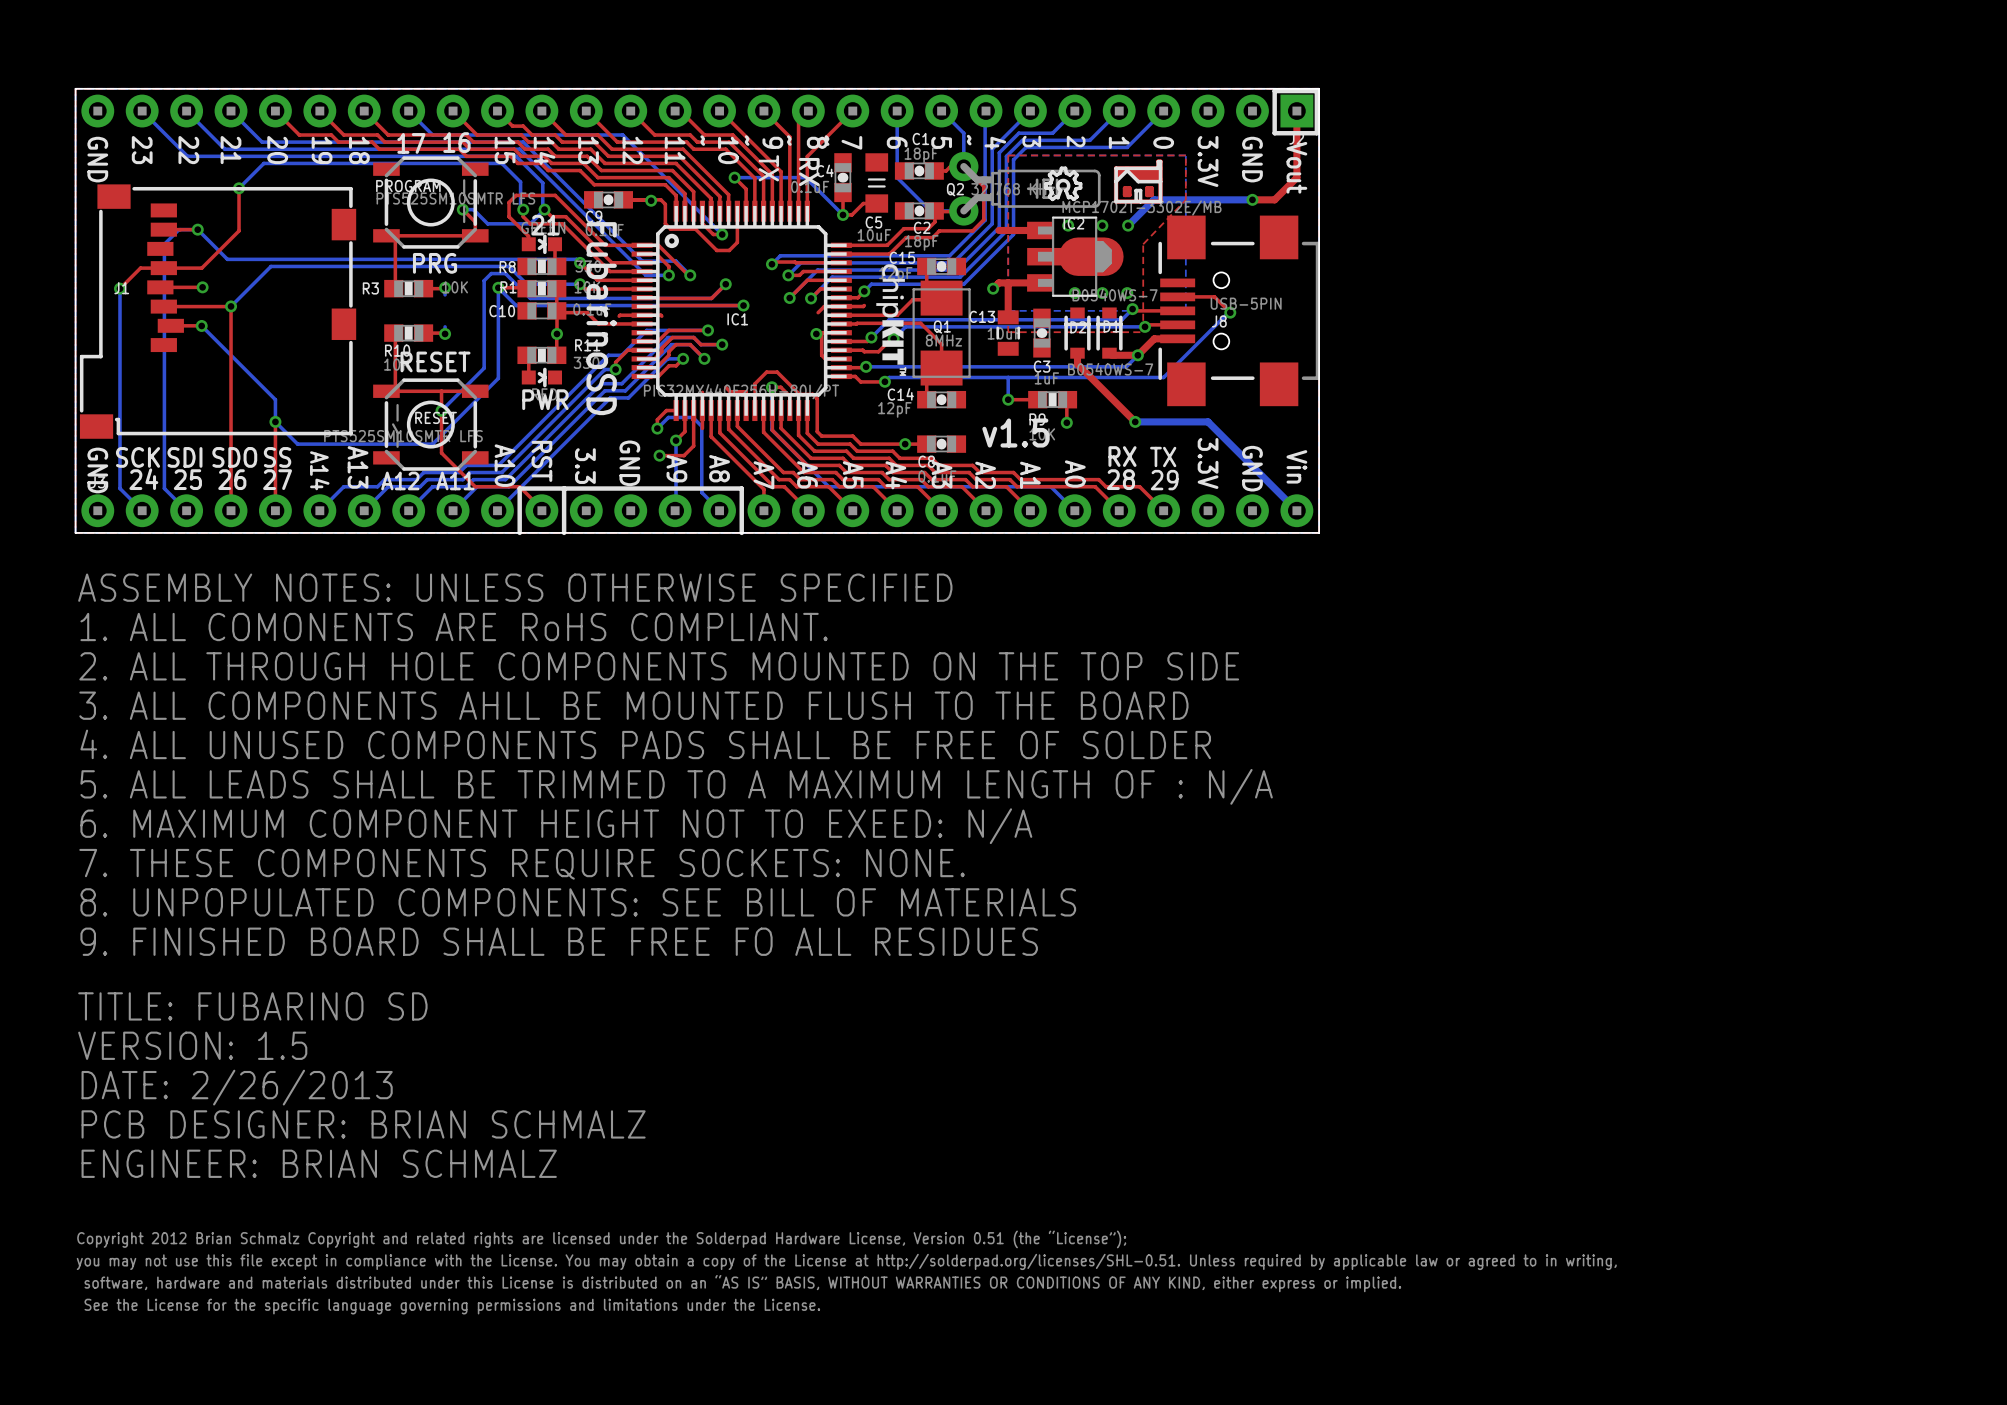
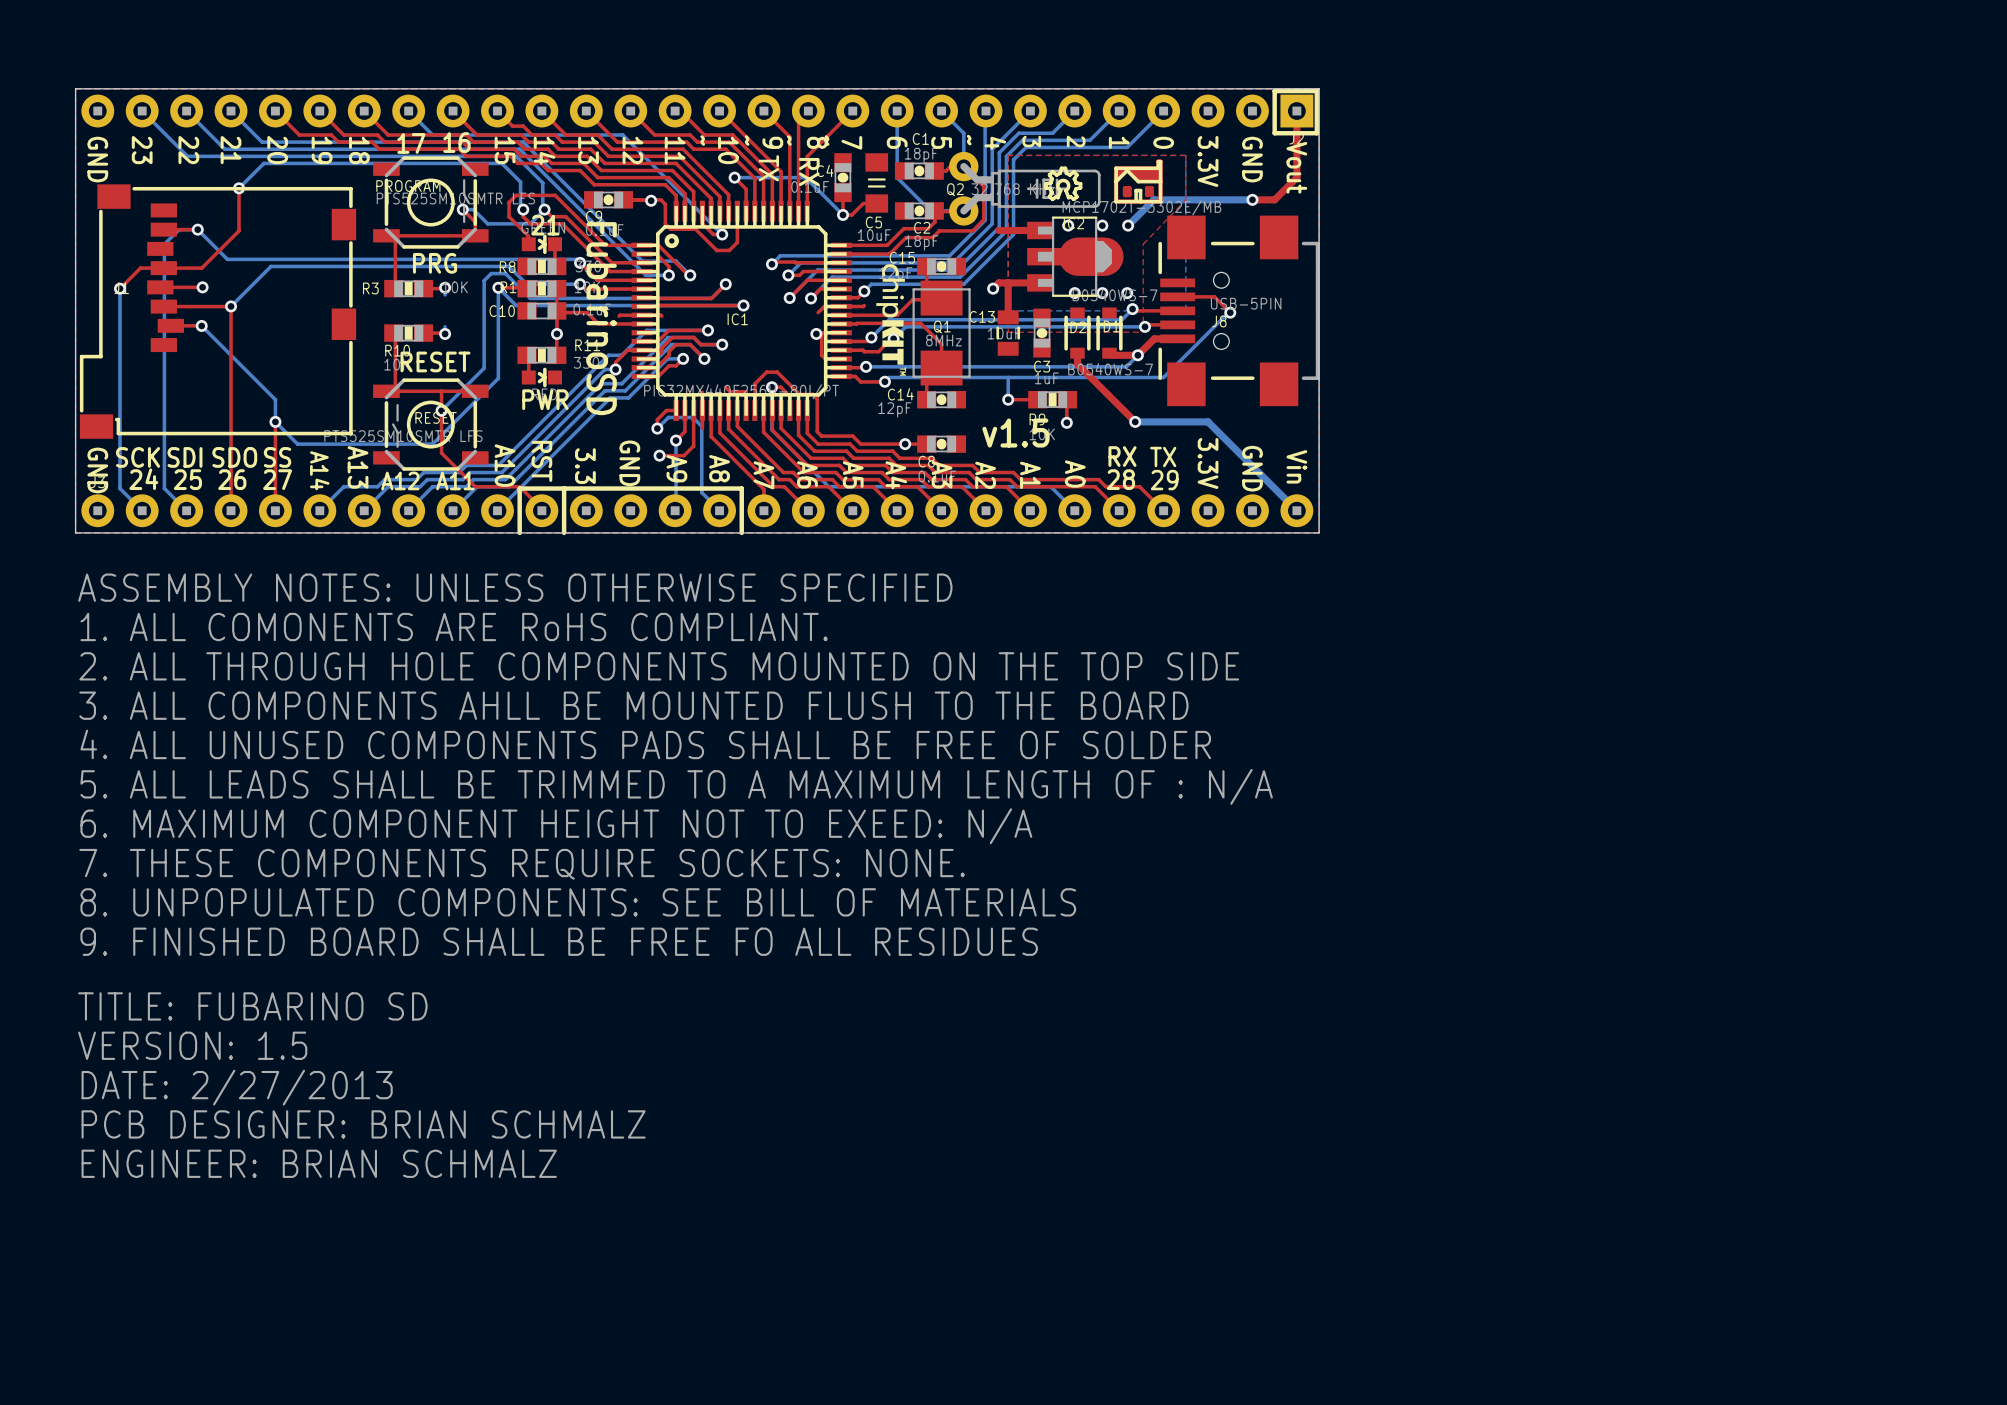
text: DATE: 2/26/2013 (237, 1087) -> DATE: 2/27/2013 (237, 1087)
text: Copyright 2012 Brian Schmalz Copyright and related rights are licensed under the Solderpad Hardware License, Version 0.51 (the “License”); (601, 1239) -> none
text: you may not use this file except in compliance with the License. You may obtain a copy of the License at http://solderpad.org/licenses/SHL-0.51. Unless required by applicable law or agreed to in writing, (846, 1261) -> none
text: software, hardware and materials distributed under this License is distributed on an “AS IS” BASIS, WITHOUT WARRANTIES OR CONDITIONS OF ANY KIND, either express or implied. (742, 1283) -> none
text: See the License for the specific language governing permissions and limitations under the License. (452, 1306) -> none

